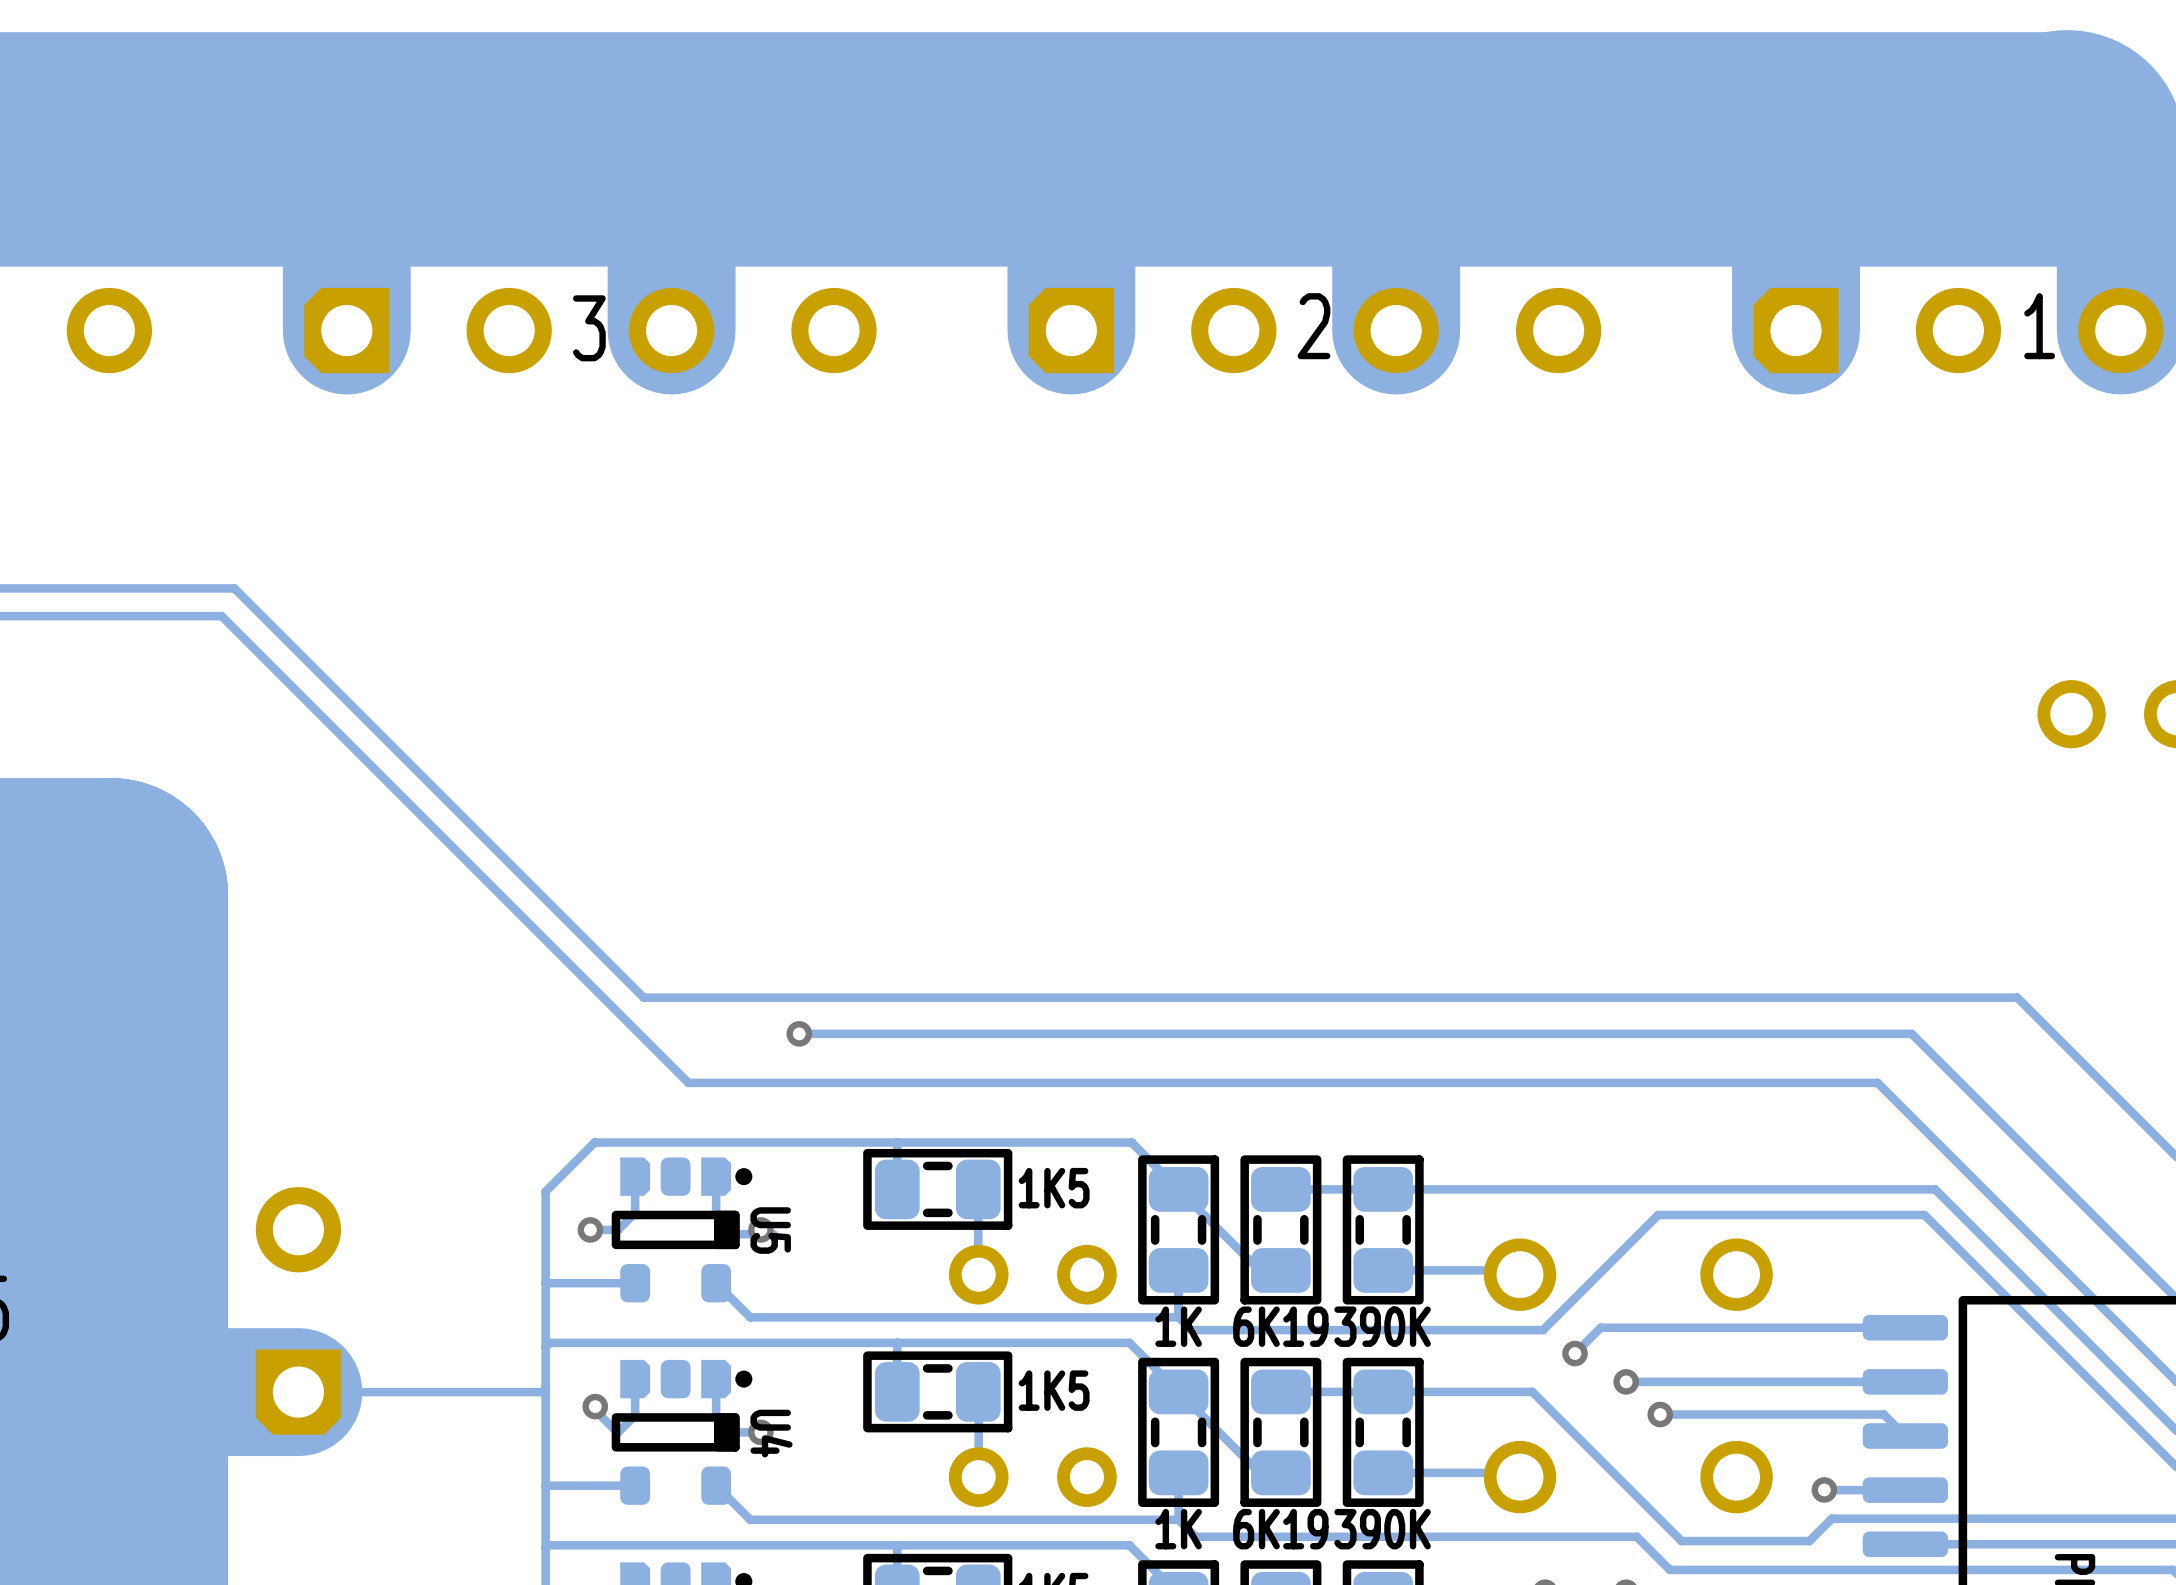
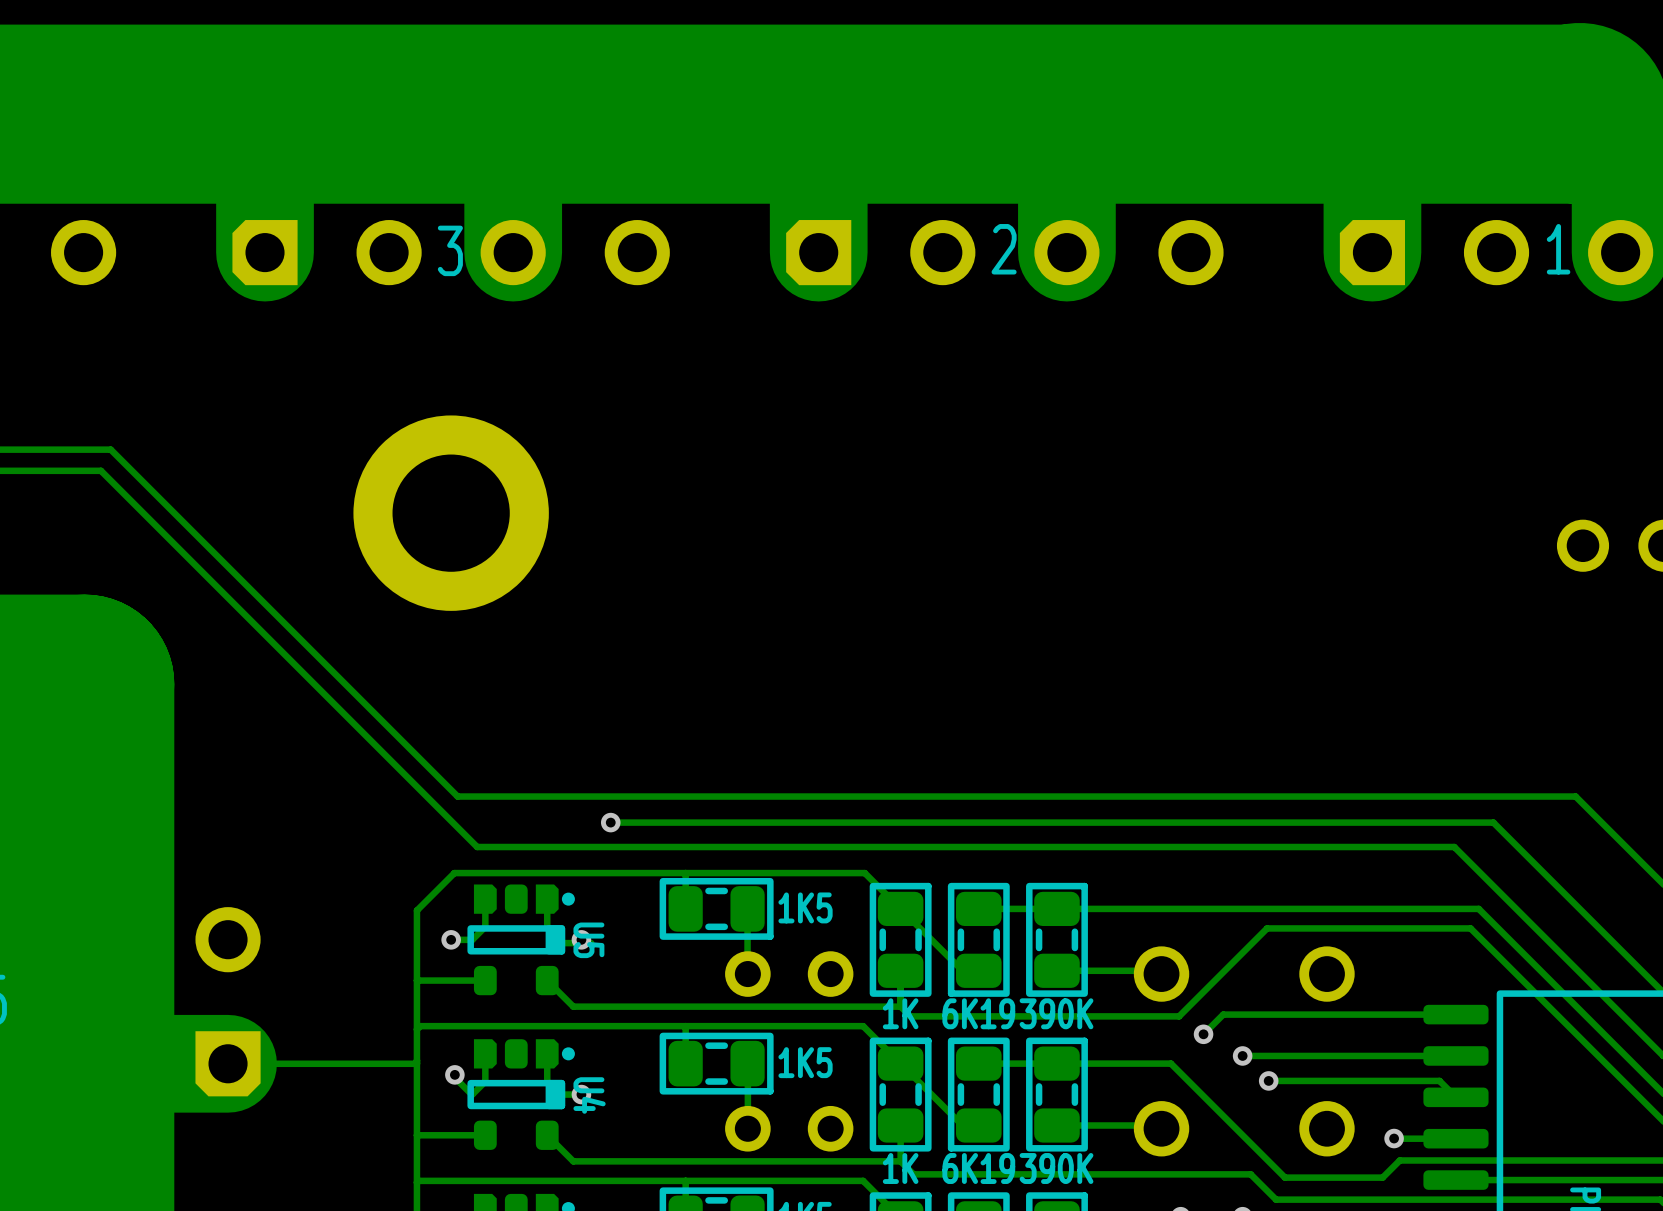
track: (144, 588) (234, 588) (643, 997) (2017, 997) (2061, 1042) -> (110, 449) (457, 796) (1575, 796)
track: (132, 616) (221, 616) (688, 1082) (1877, 1082) (1903, 1108) -> (101, 470) (477, 847) (1454, 847)
part: none -> (451, 513)
track: (799, 1033) (1911, 1033) (1954, 1076) -> (610, 822) (1493, 822)
via position: (799, 1033) -> (610, 822)

